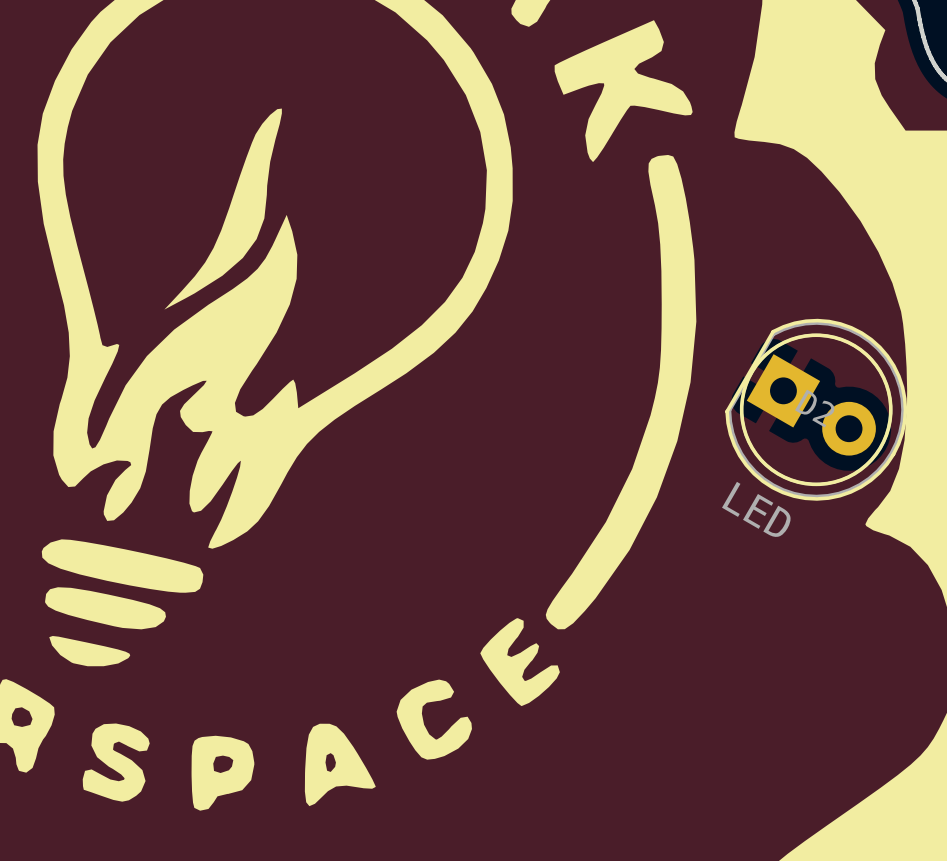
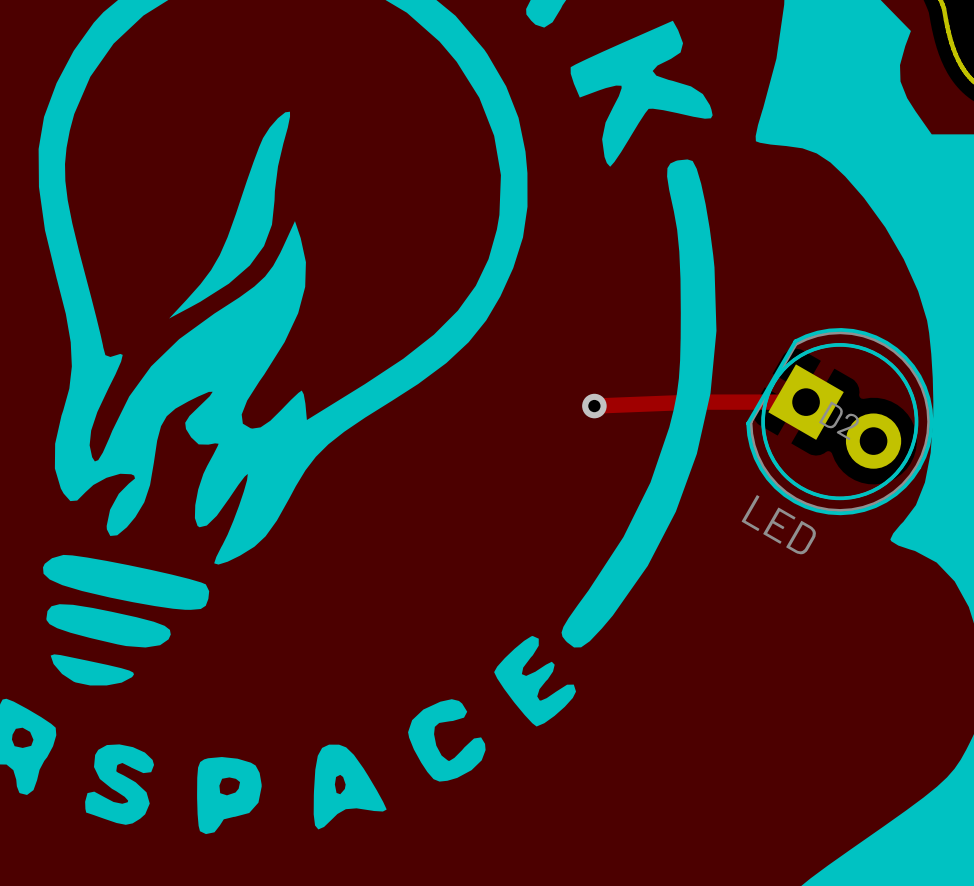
track: none -> (806, 402) (695, 402) (594, 406)
via: none -> (594, 406)

